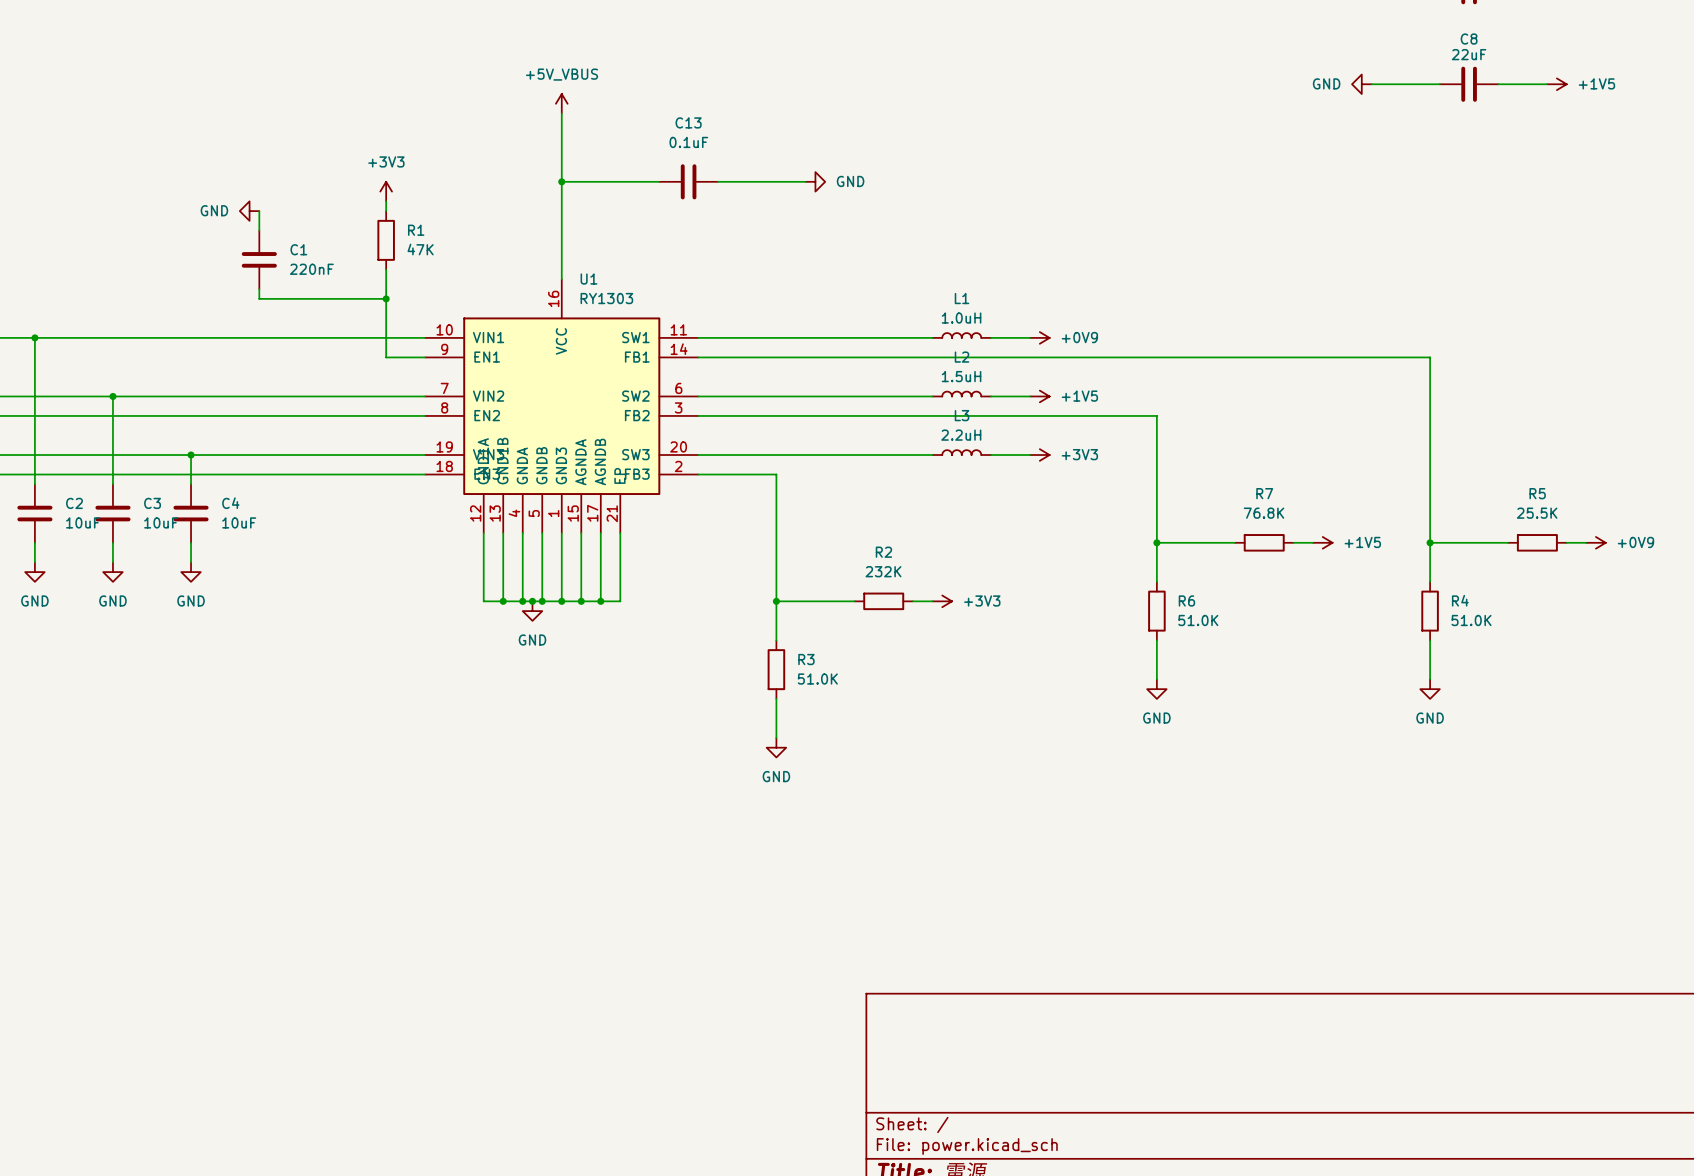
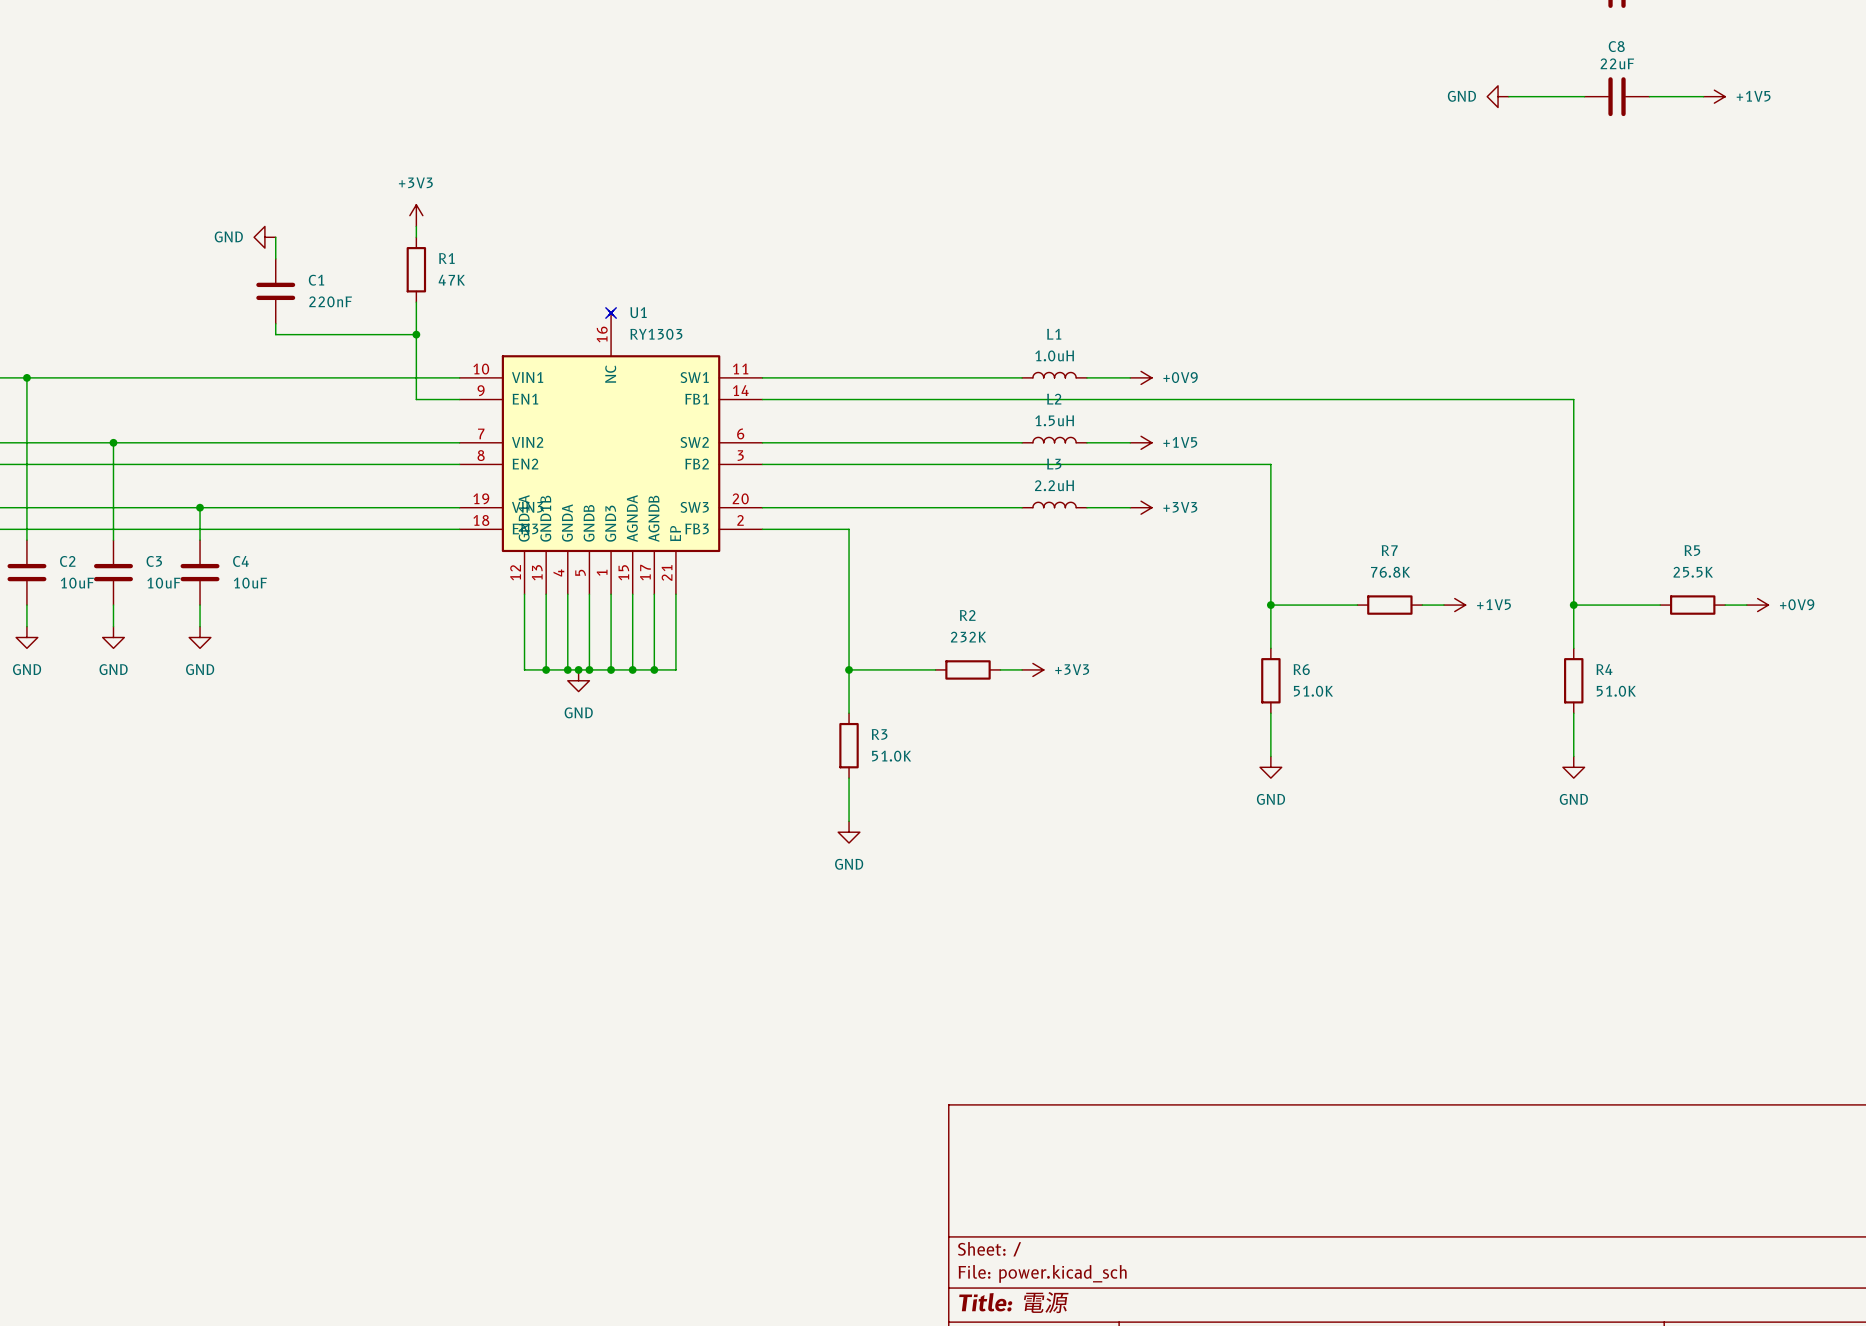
power symbol: +5V_VBUS (561, 103) -> none
wire: (561, 113) (561, 279) -> none
wire: (561, 181) (659, 181) -> none
junction: (561, 181) -> none
C13: 0.1uF (688, 181) -> none
wire: (717, 181) (805, 181) -> none
power symbol: GND (815, 181) -> none
U1 symbol: [425, 279, 699, 534] -> [459, 310, 763, 595]
no-connect mark: none -> (611, 313)

